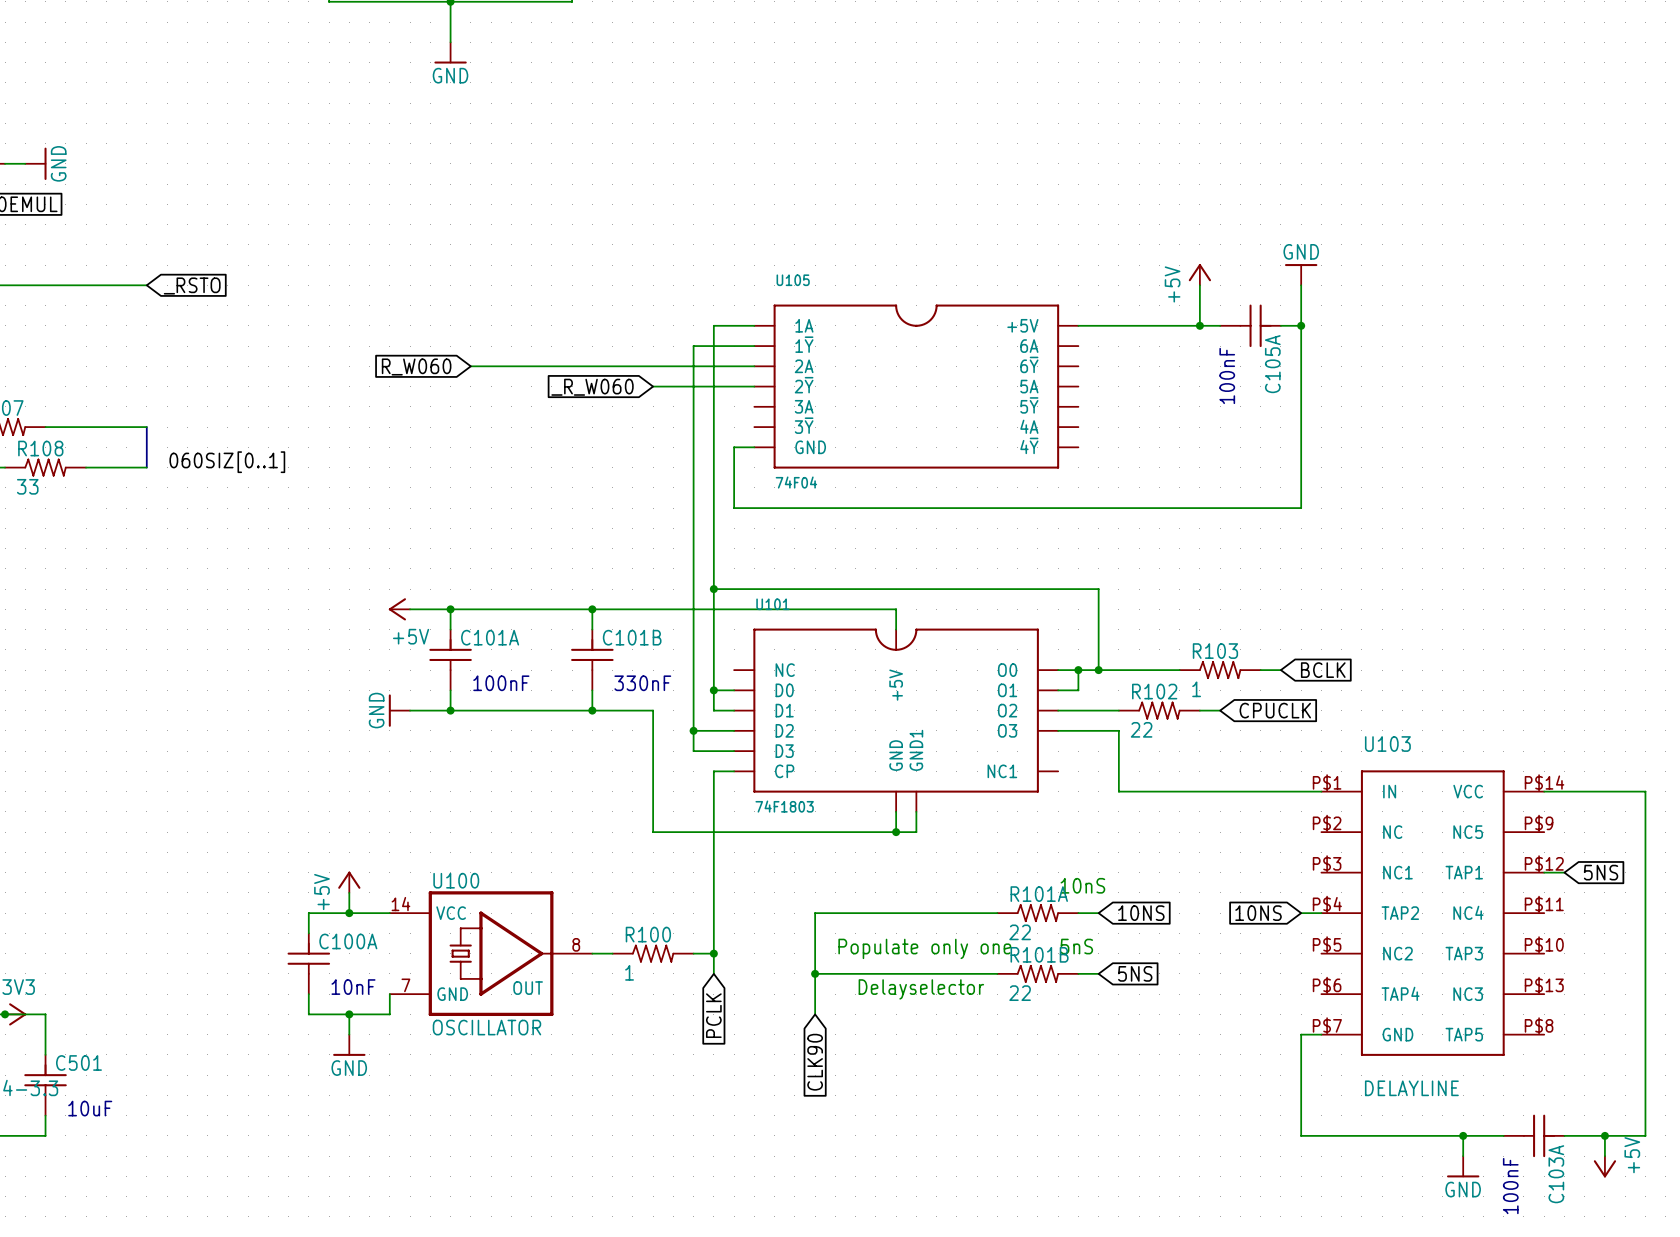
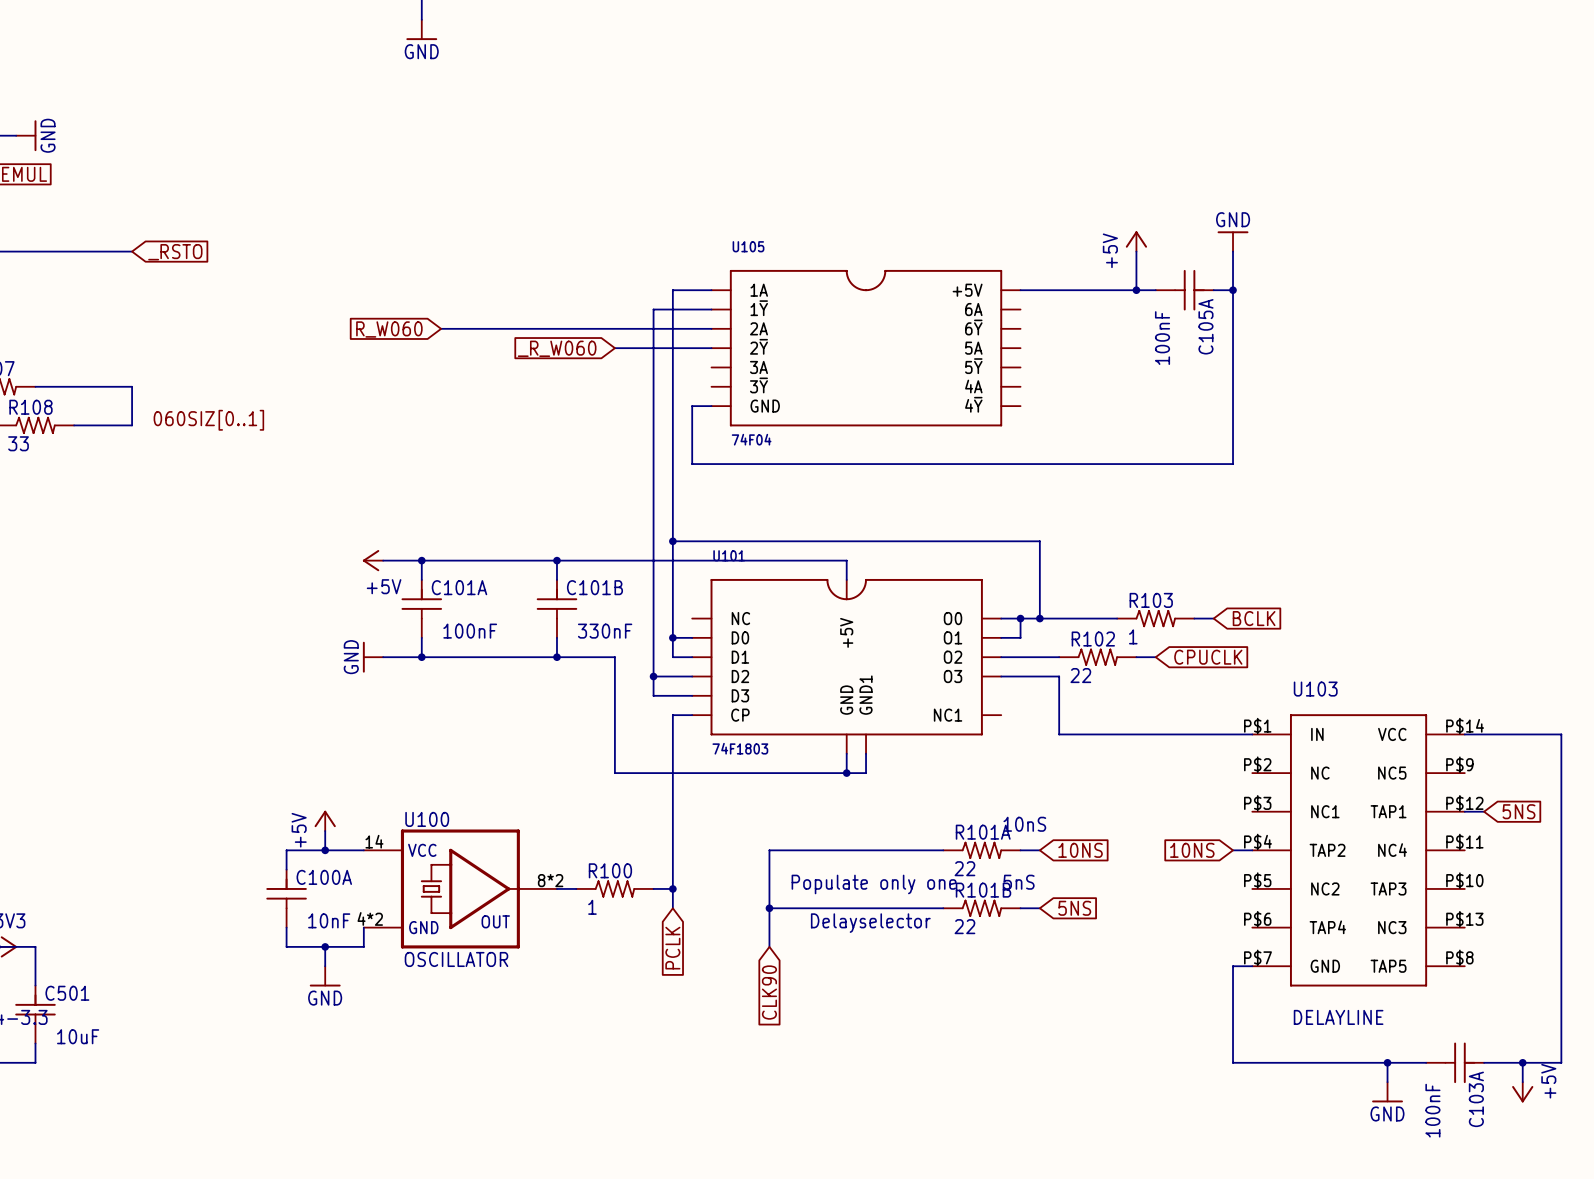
U100 pin number: 8 (576, 944) -> 8*2 (550, 880)
U100 pin number: 7 (405, 985) -> 4*2 (370, 918)

